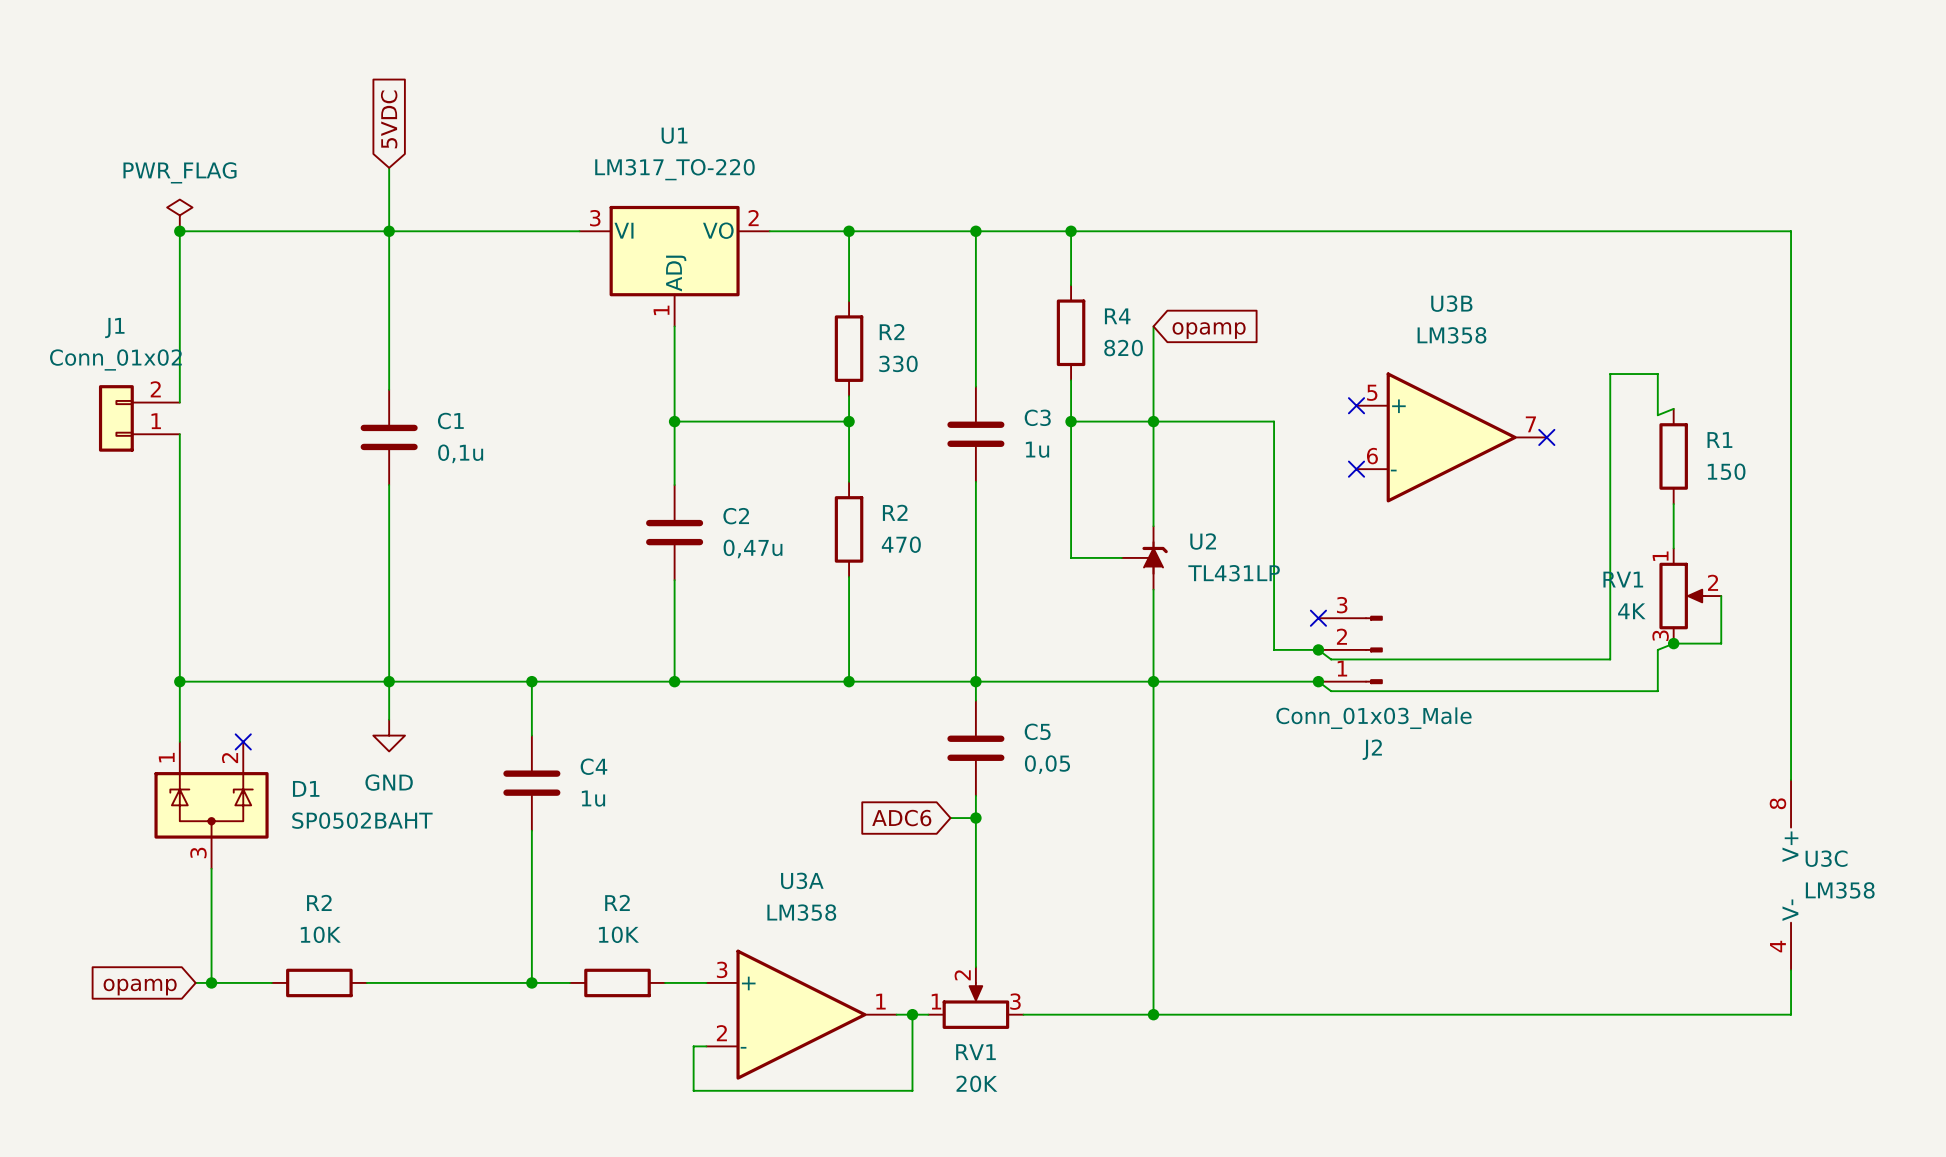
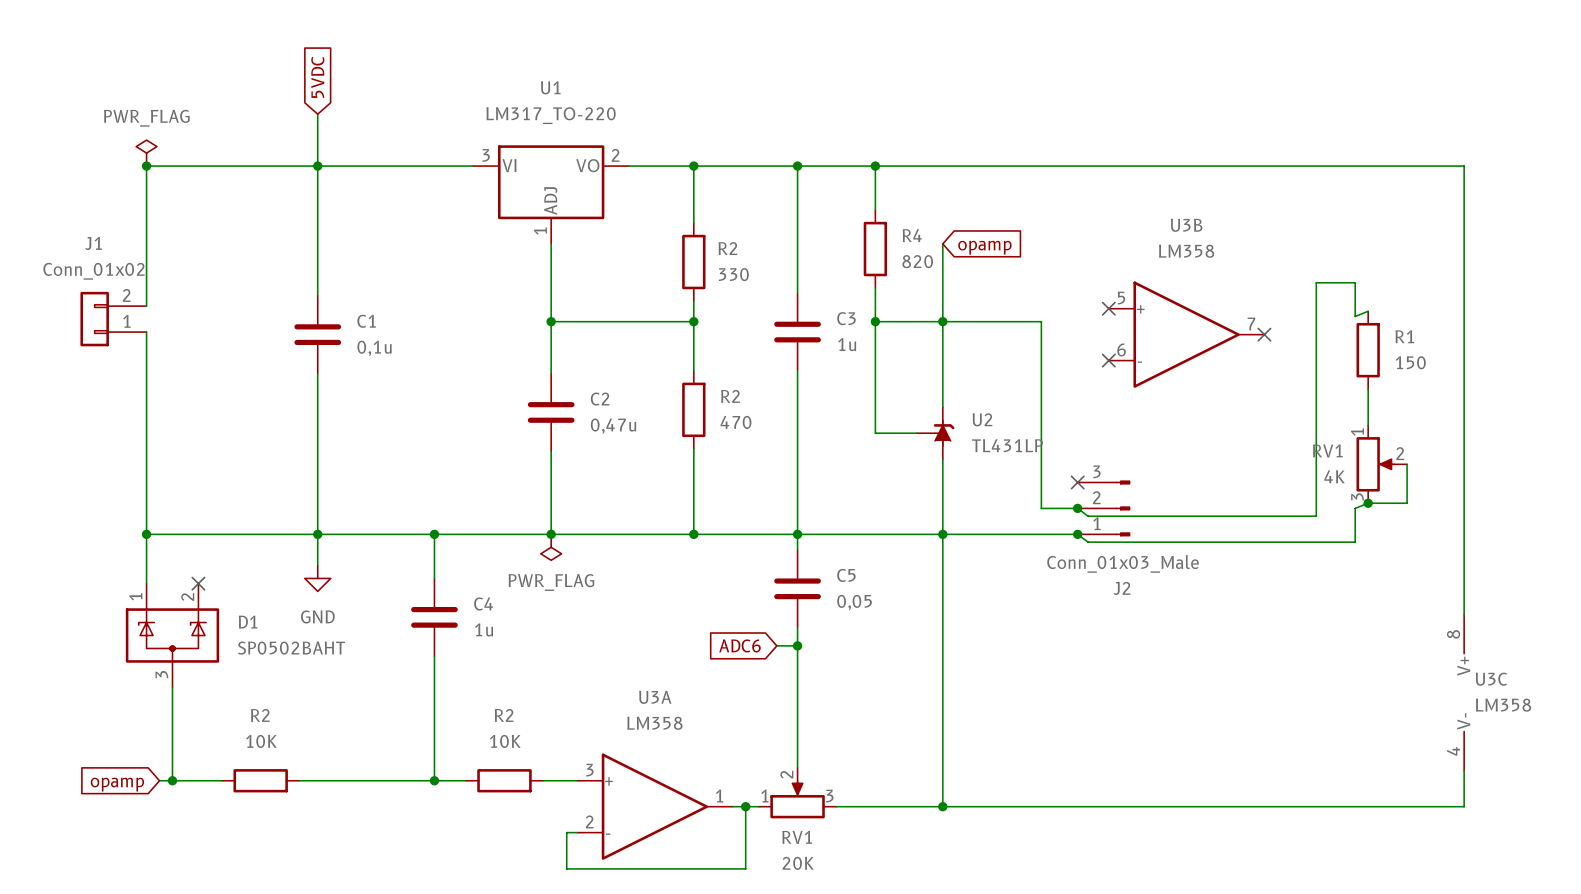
power symbol: none -> PWR_FLAG (551, 547)

